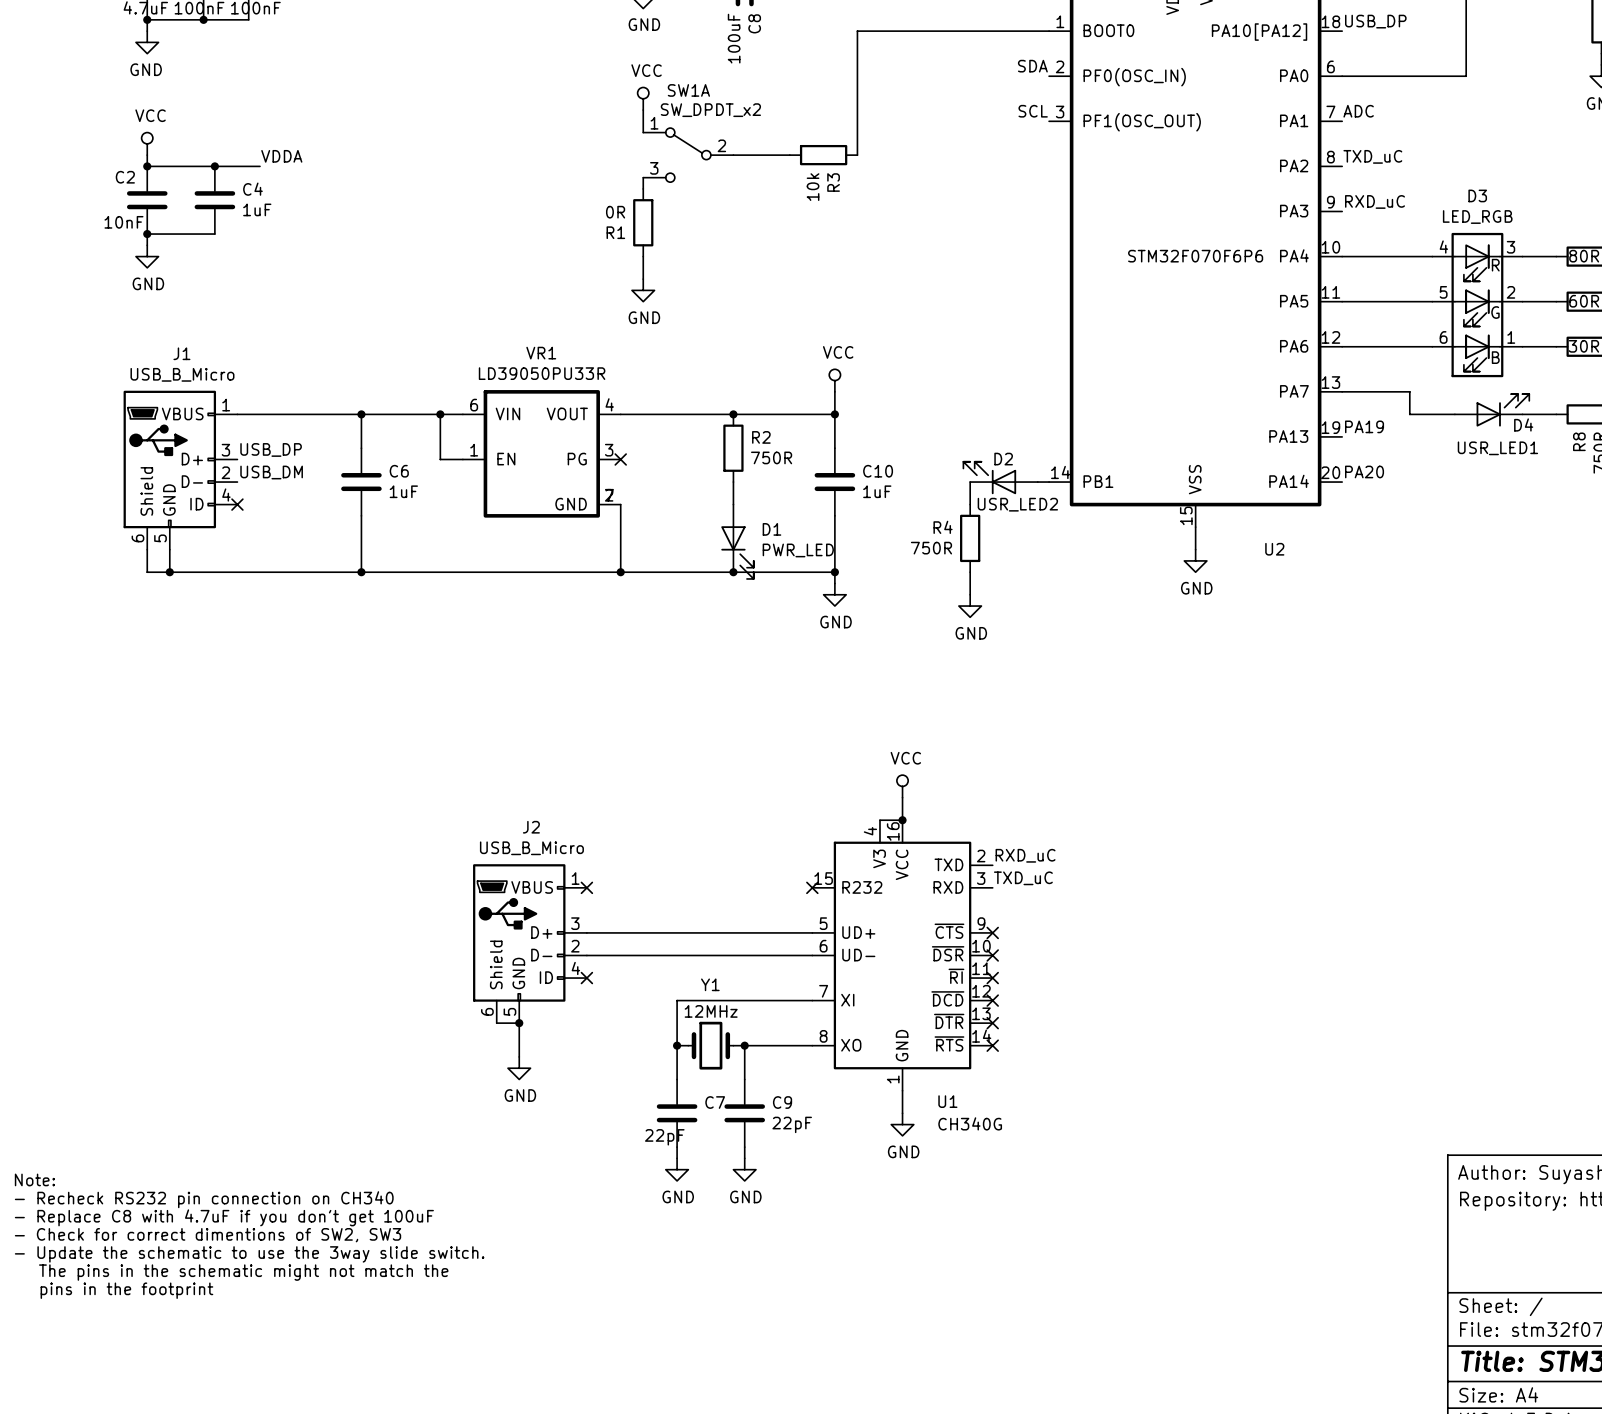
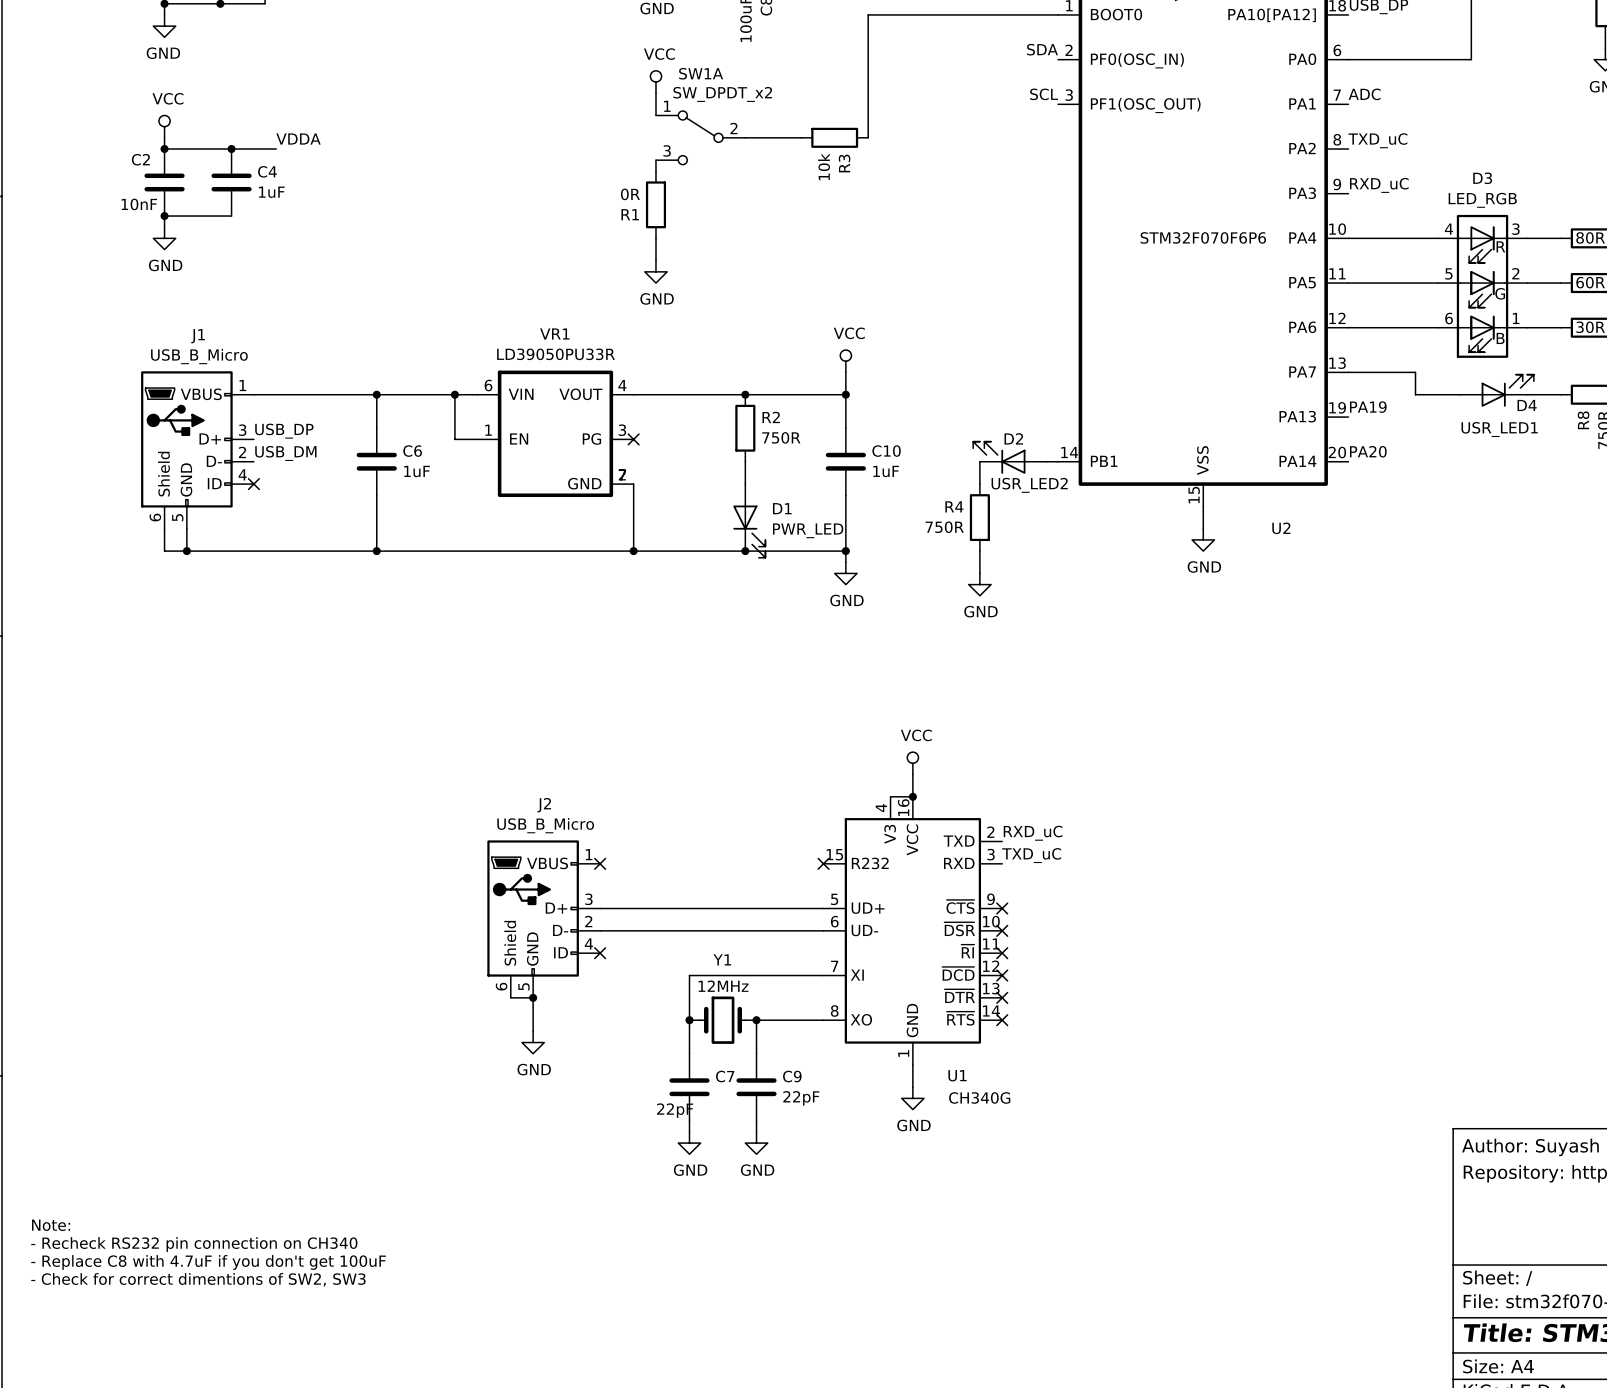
text: Note: (34, 1179) -> none
text: - Recheck RS232 pin connection on CH340 (204, 1199) -> none
text: - Replace C8 with 4.7uF if you don't get 100uF (224, 1217) -> none
text position: - Check for correct dimentions of SW2, SW3 (208, 1235) -> - Check for correct dimentions of SW2, SW3 (198, 1279)
text: - Update the schematic to use the 3way slide switch. (249, 1254) -> Note: (51, 1225)
text: The pins in the schematic might not match the (243, 1272) -> - Recheck RS232 pin connection on CH340 (194, 1244)
text: pins in the footprint (126, 1290) -> - Replace C8 with 4.7uF if you don't get 100uF (208, 1262)

